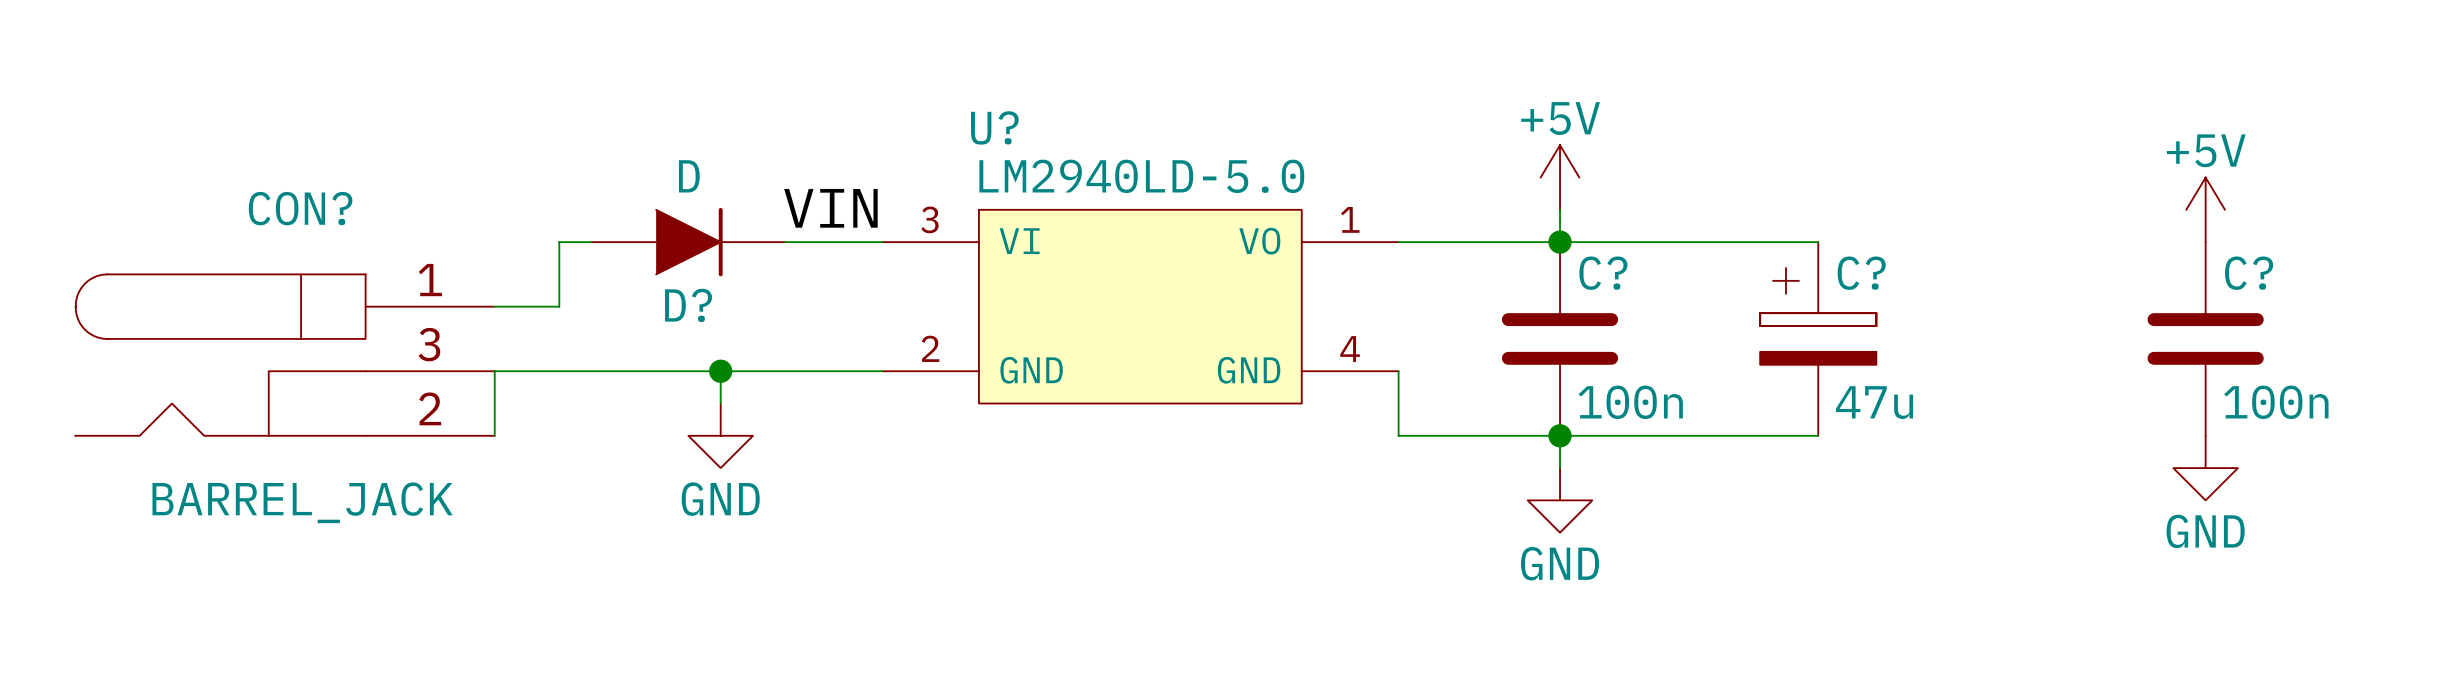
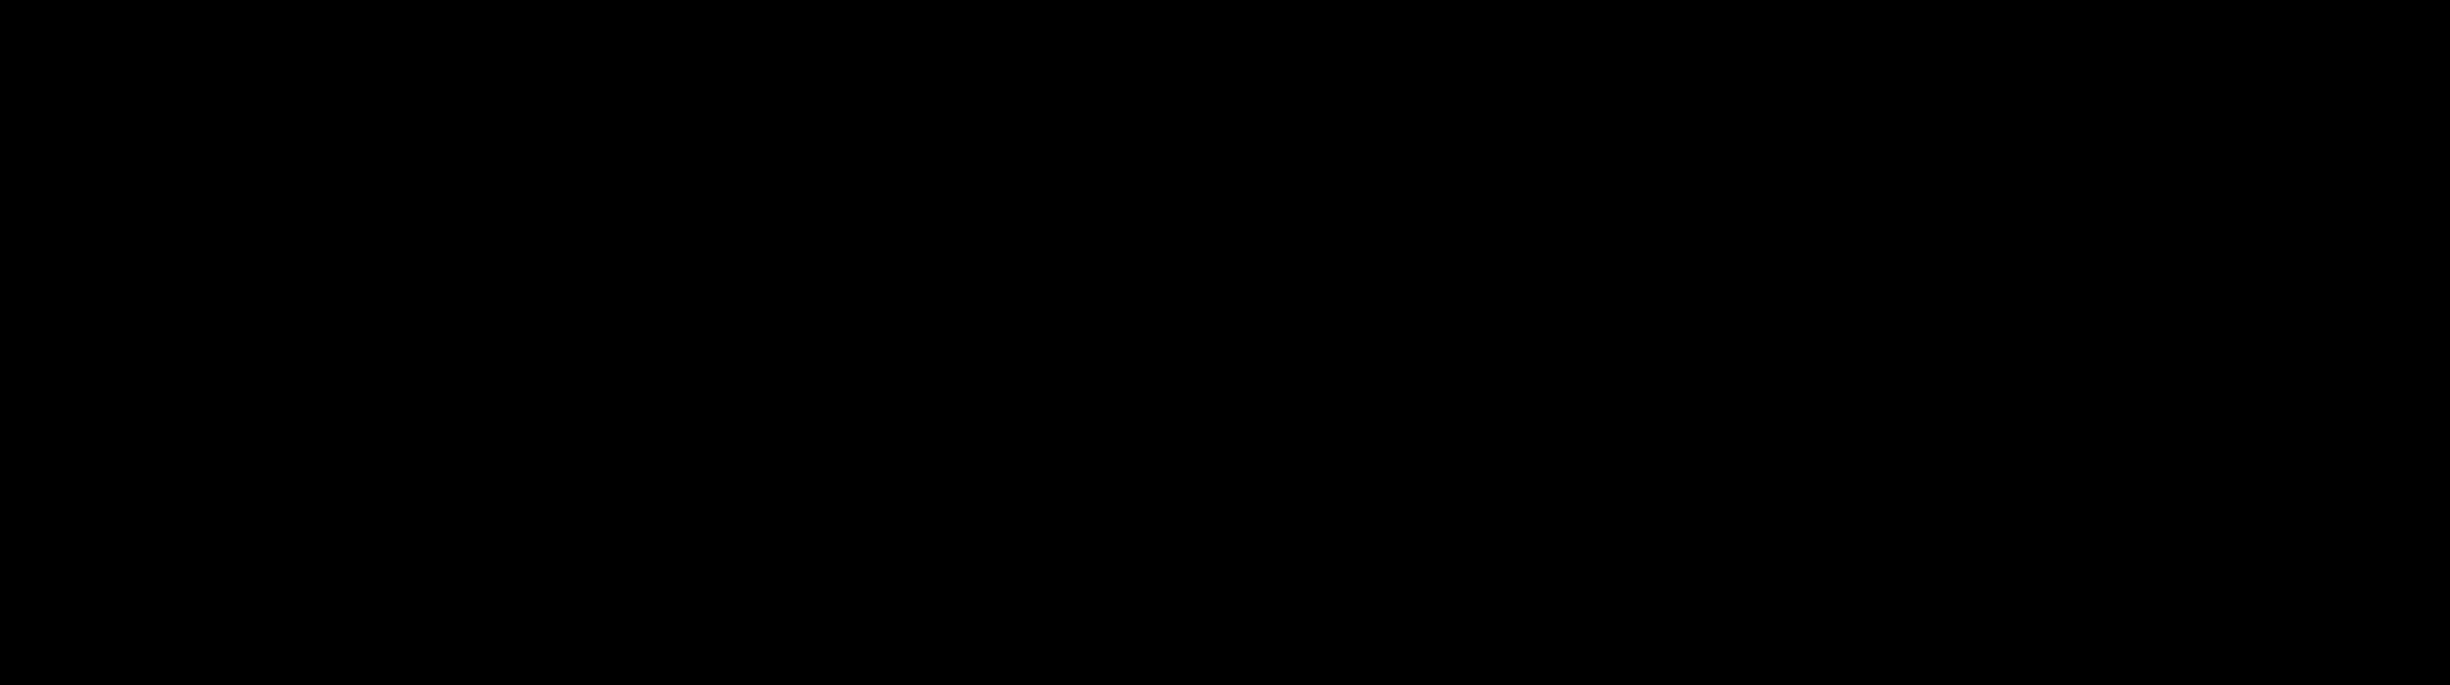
power symbol: +5V (1560, 177) -> none
label: VIN (830, 208) -> none
wire: (1560, 209) (1560, 242) -> none
power symbol: +5V (2205, 209) -> none
wire: (591, 242) (559, 242) (559, 306) (494, 306) -> none
D?: D (688, 242) -> none
wire: (785, 242) (882, 242) -> none
wire: (1398, 242) (1818, 242) -> none
junction: (1560, 242) -> none
U?: LM2940LD-5.0 (1140, 306) -> none
C?: 100n (1560, 338) -> none
C?: 47u (1818, 338) -> none
C?: 100n (2205, 338) -> none
CON?: BARREL_JACK (284, 355) -> none
wire: (720, 371) (720, 403) -> none
junction: (720, 371) -> none
wire: (882, 371) (494, 371) (494, 435) -> none
wire: (1398, 371) (1398, 435) (1818, 435) -> none
power symbol: GND (720, 435) -> none
wire: (1560, 435) (1560, 468) -> none
junction: (1560, 435) -> none
power symbol: GND (2205, 468) -> none
power symbol: GND (1560, 500) -> none

